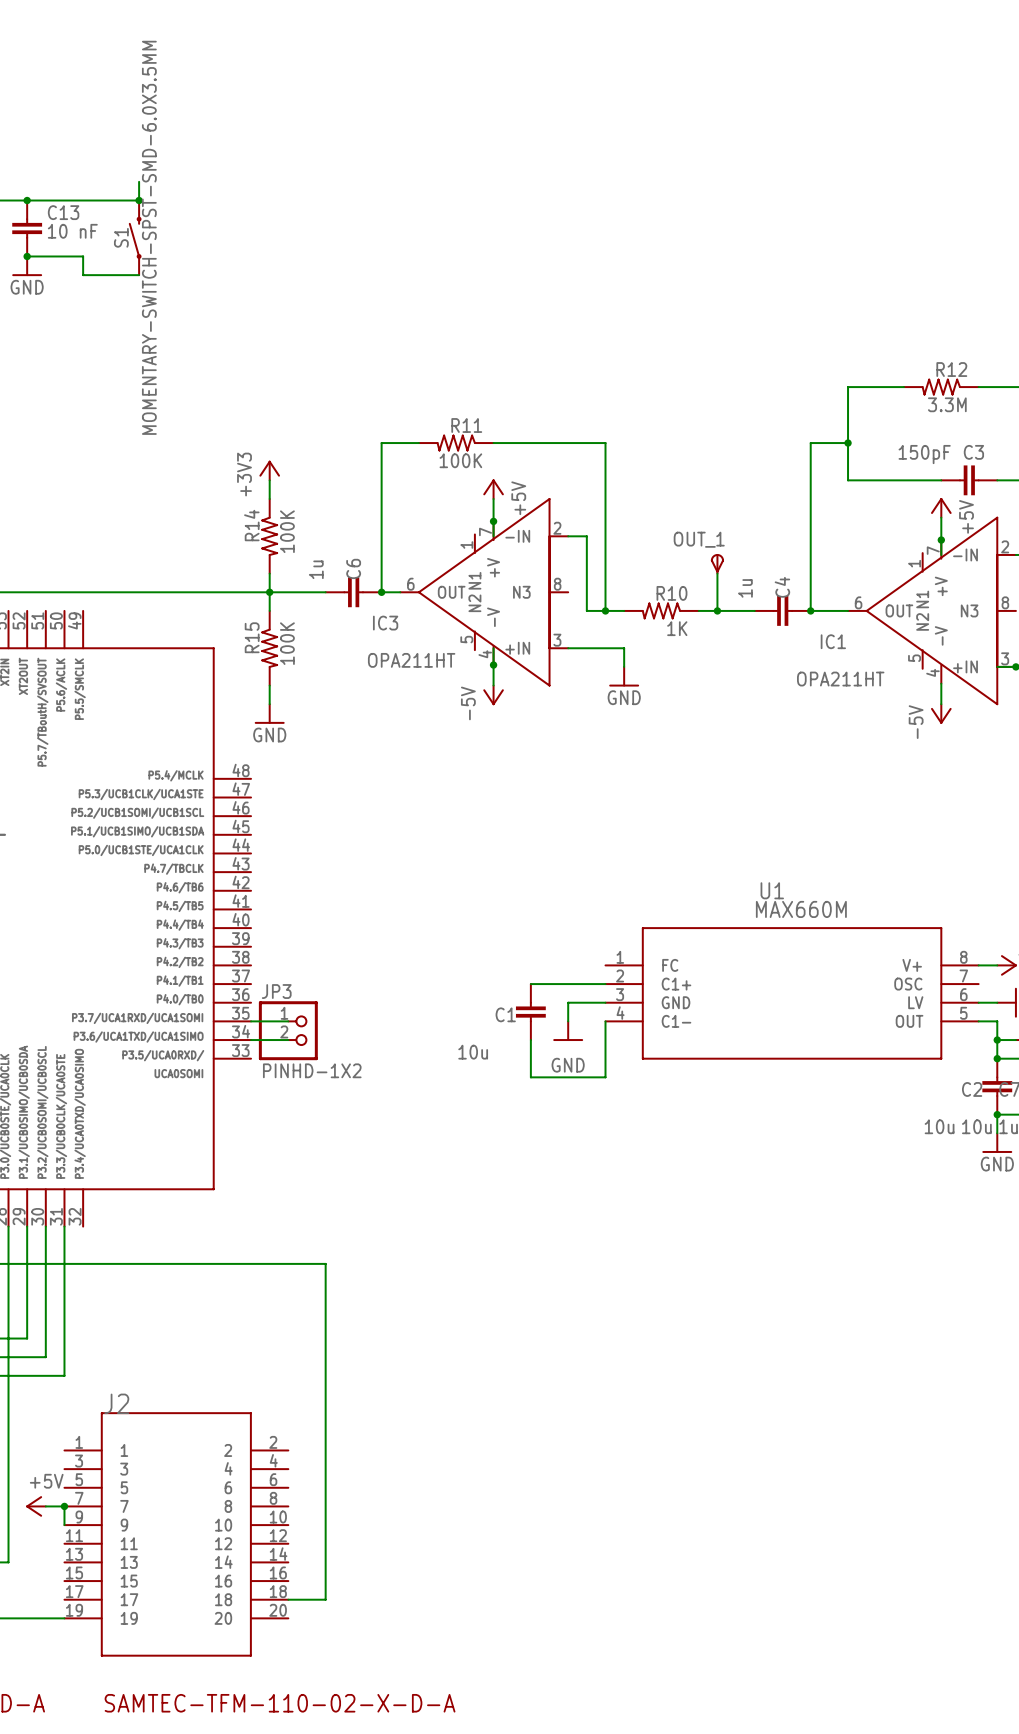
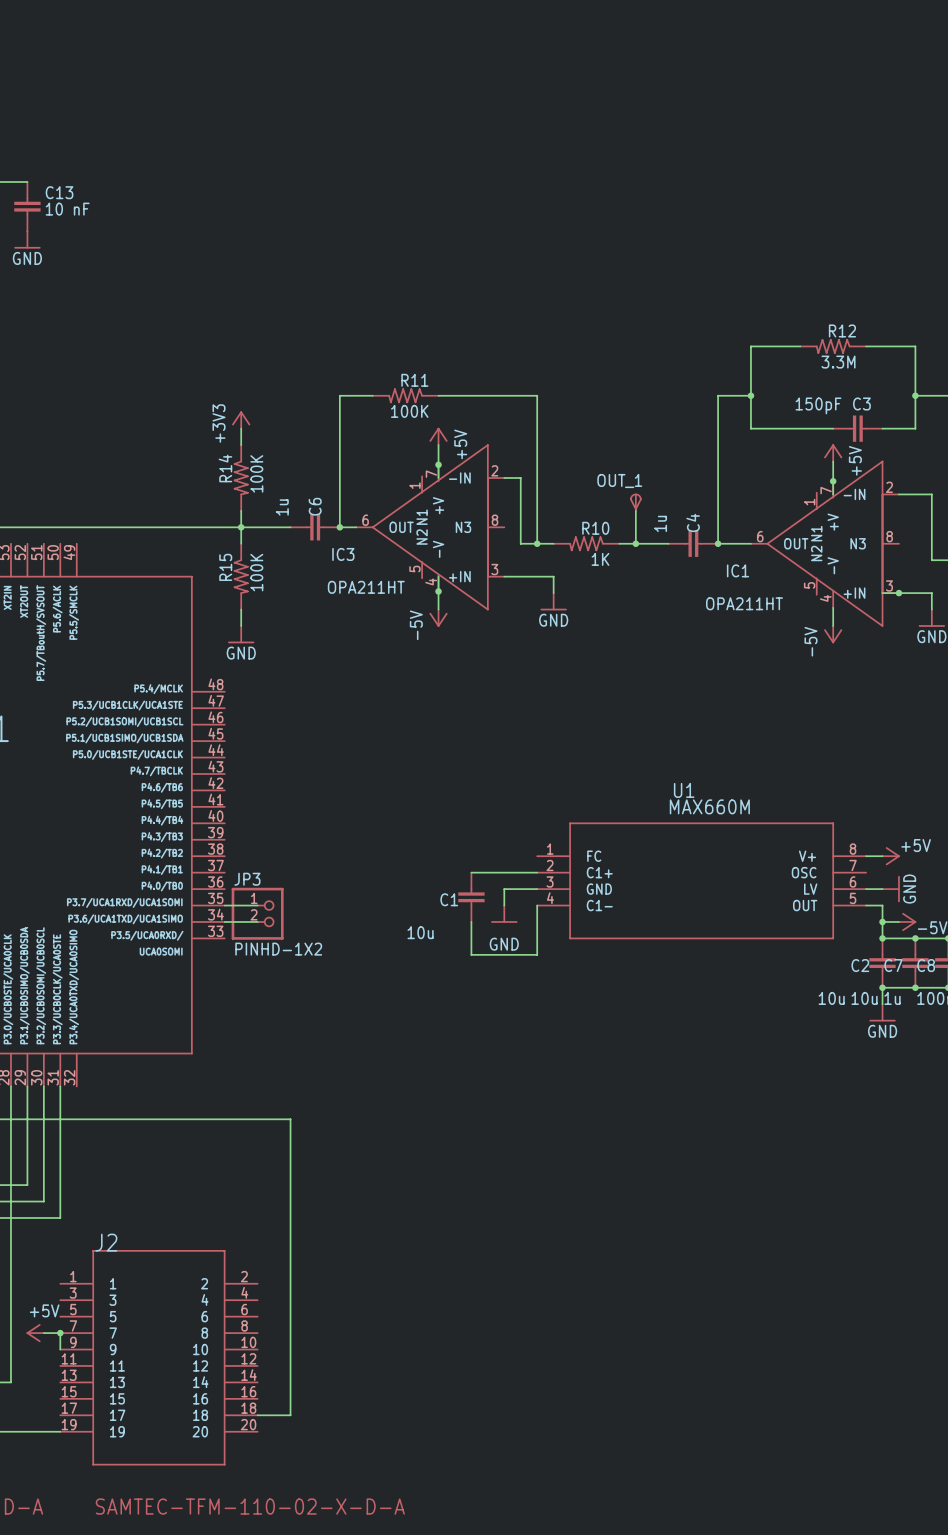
wire: (139, 181) (139, 200) (27, 200) -> none
junction: (27, 200) -> none
junction: (139, 200) -> none
S1: MOMENTARY-SWITCH-SPST-SMD-6.0X3.5MM (135, 237) -> none
wire: (27, 256) (83, 256) (83, 275) (139, 275) -> none
junction: (27, 256) -> none

